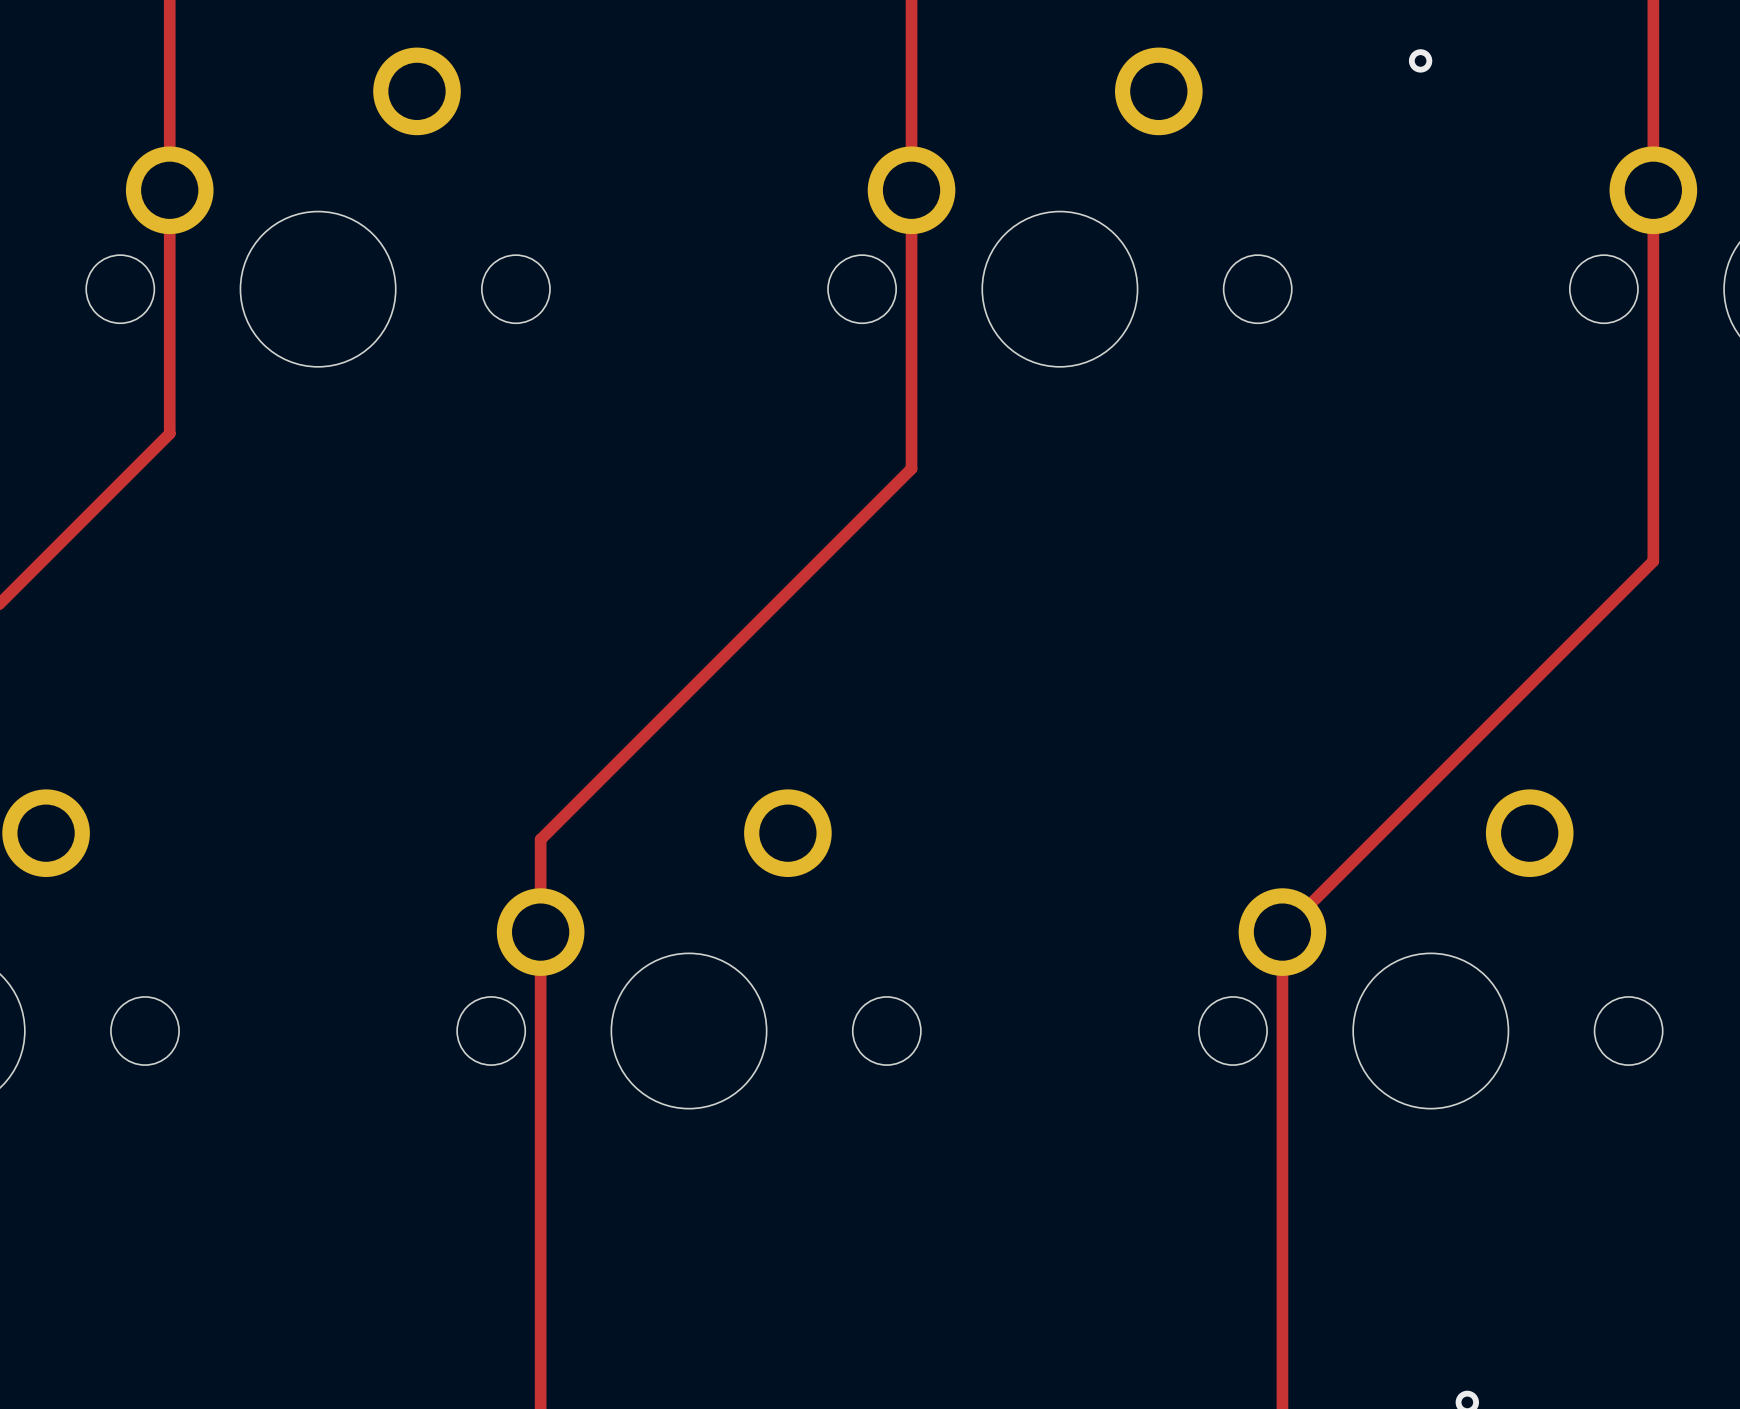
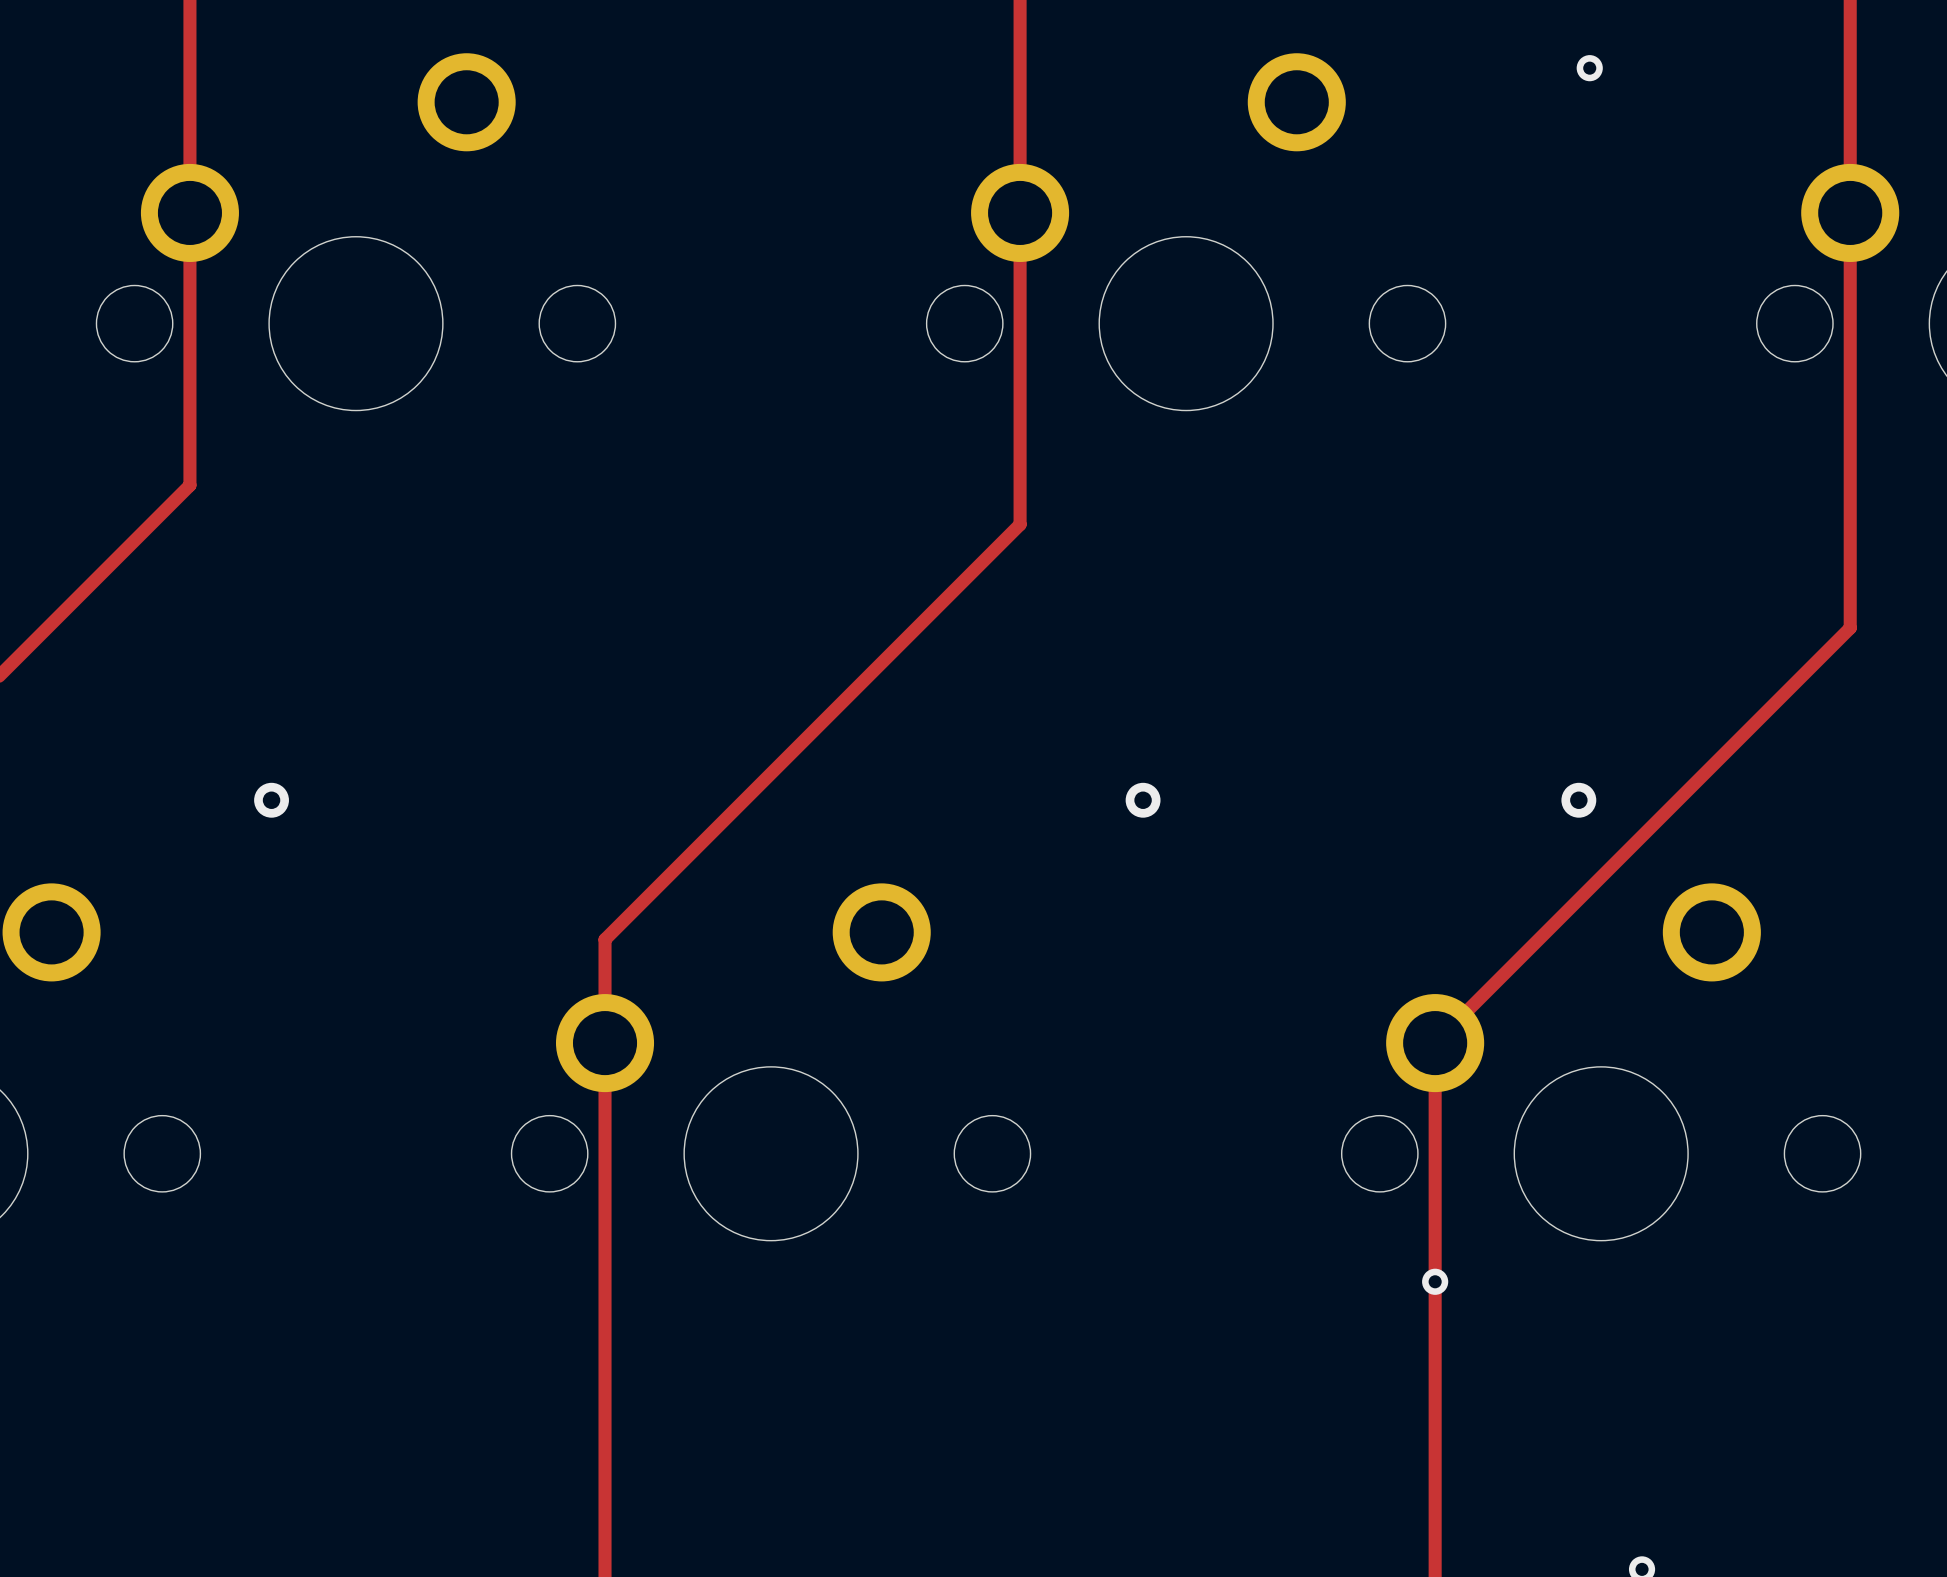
via: none -> (271, 800)
via: none -> (1143, 800)
via: none -> (1578, 800)
via: none -> (1435, 1281)

